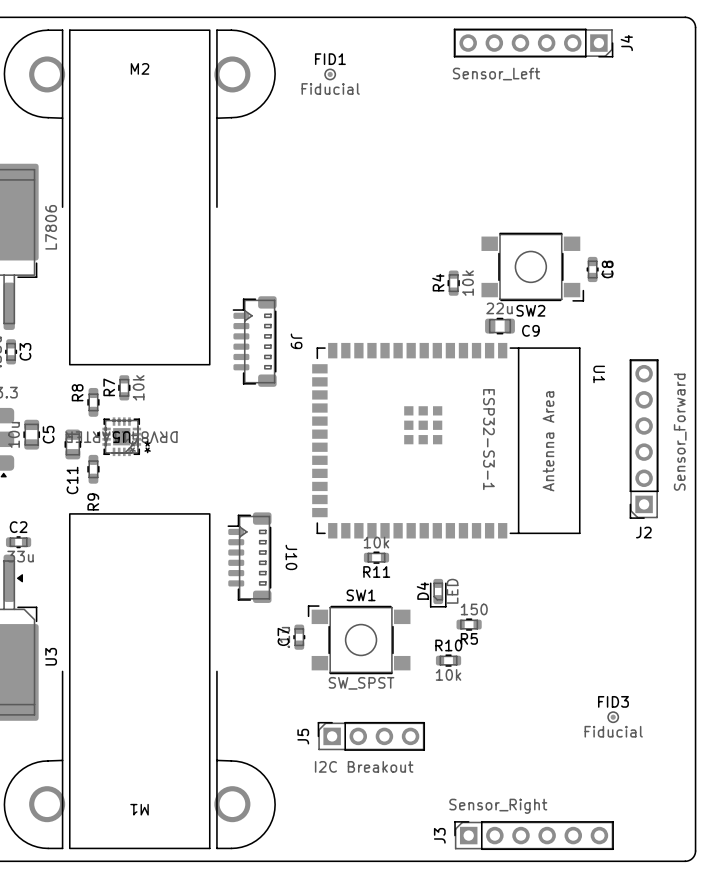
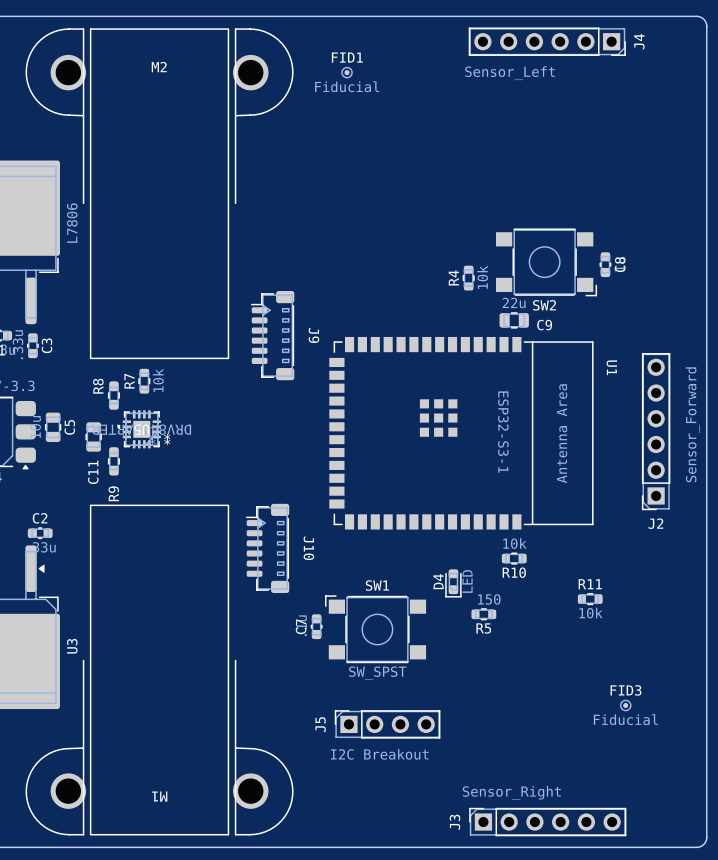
R11 value position: 10k (376, 542) -> 10k (590, 613)
R11 position: (376, 557) -> (590, 599)
R11 name position: R11 (376, 572) -> R11 (590, 584)
R10 name position: R10 (448, 645) -> R10 (514, 572)
R10 position: (448, 660) -> (514, 558)
R10 value position: 10k (448, 674) -> 10k (514, 543)

